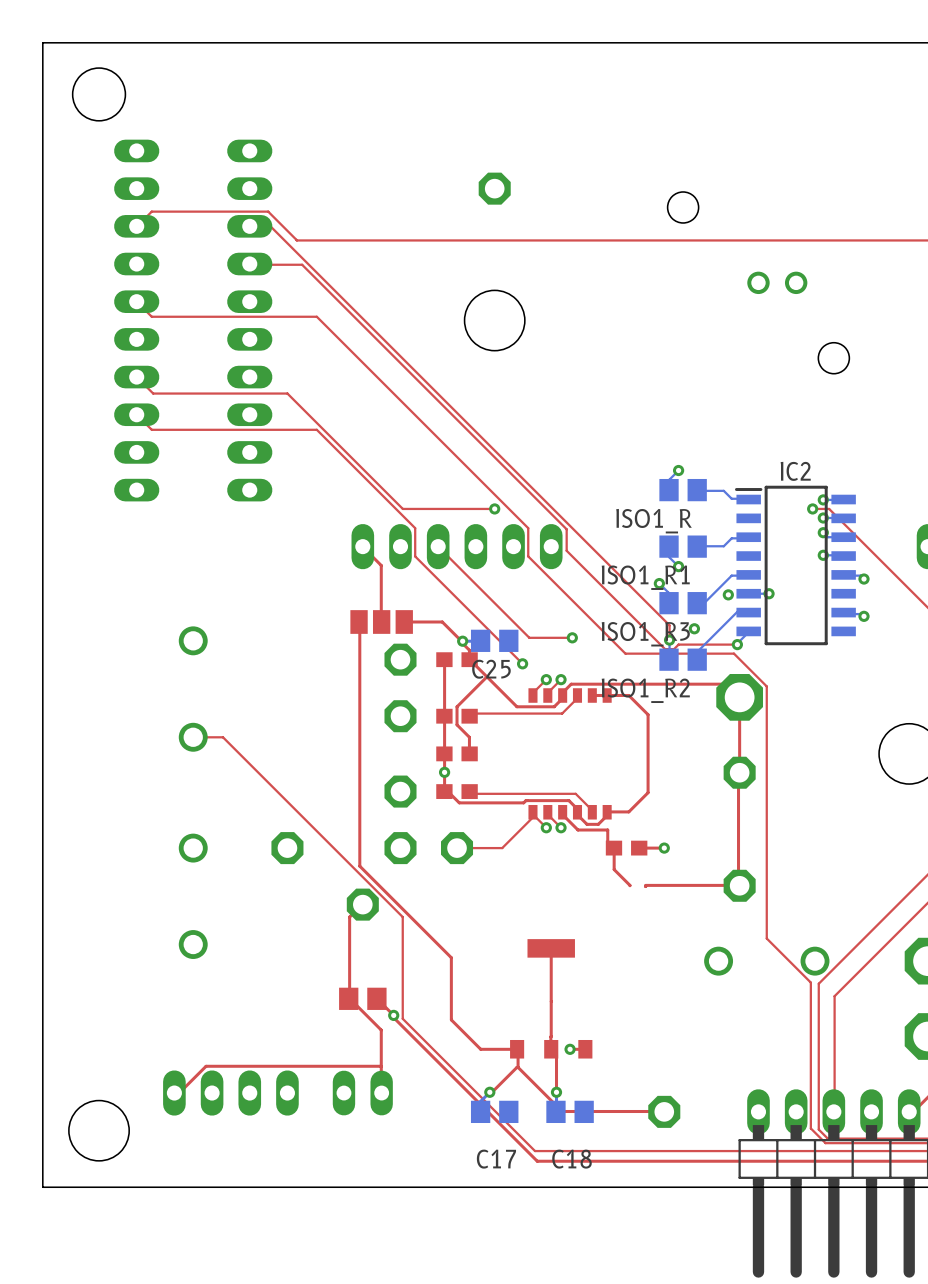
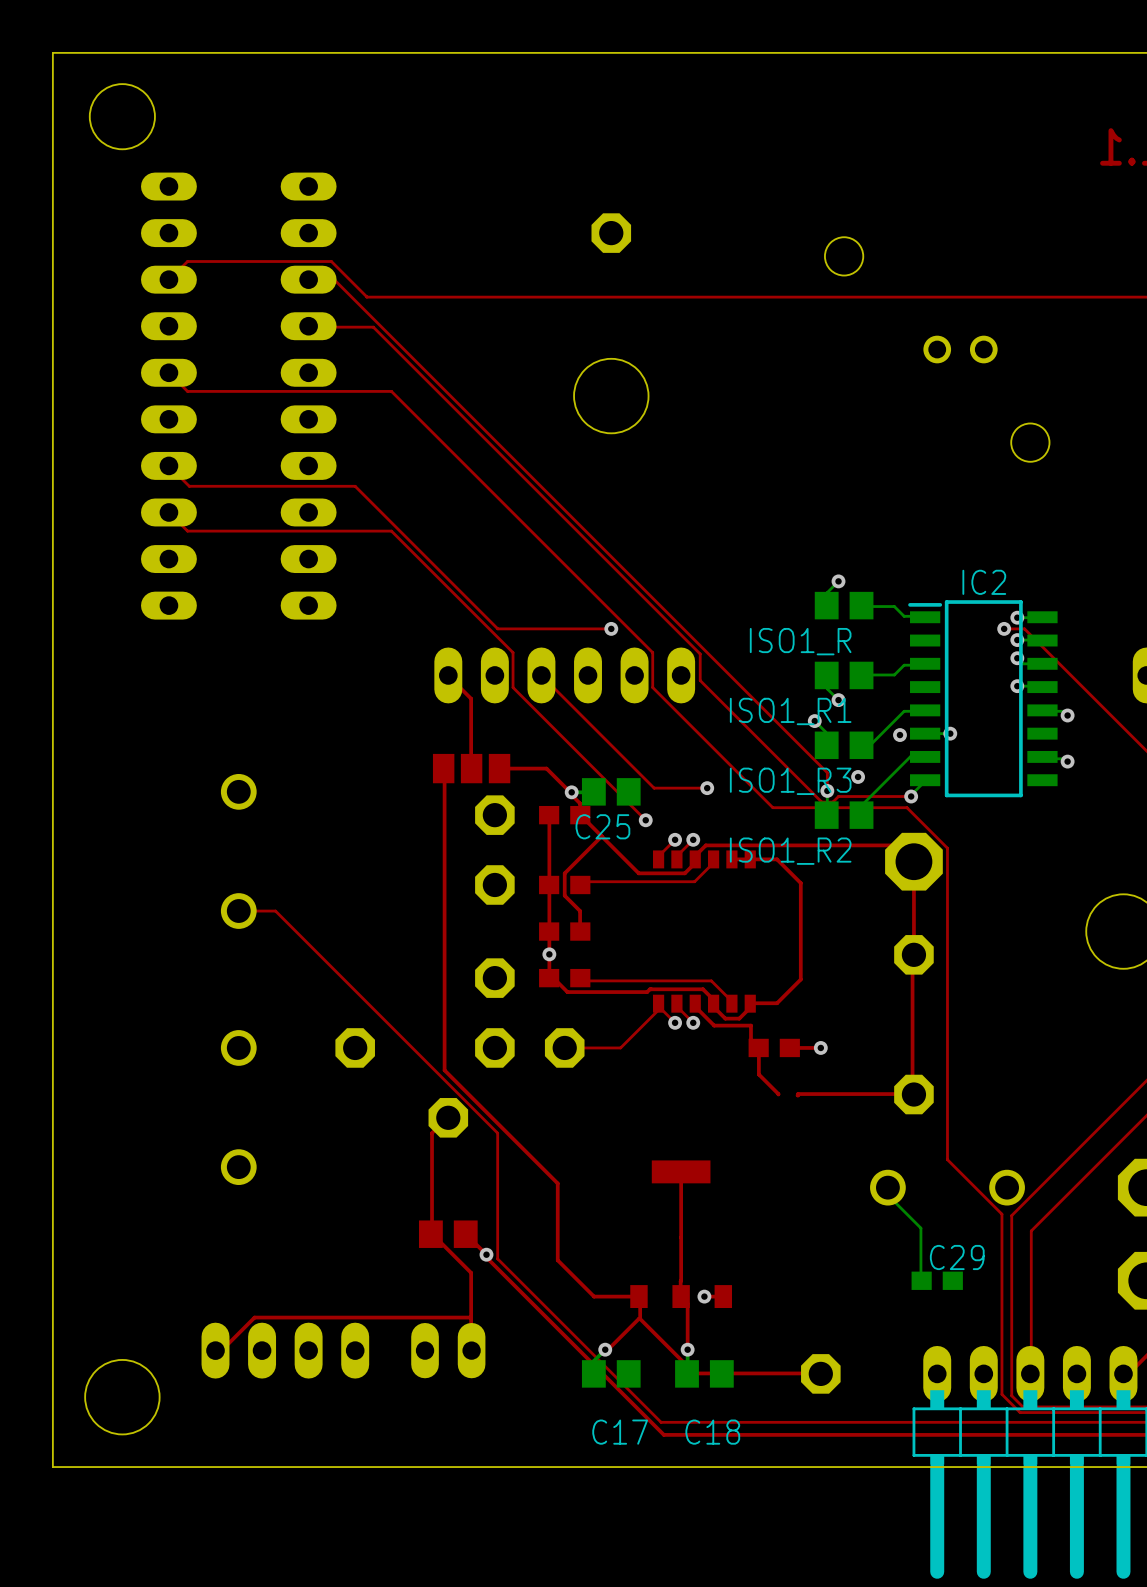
bottom track: none -> (887, 1187) (888, 1196) (920, 1228) (921, 1280)
C29: none -> (937, 1280)

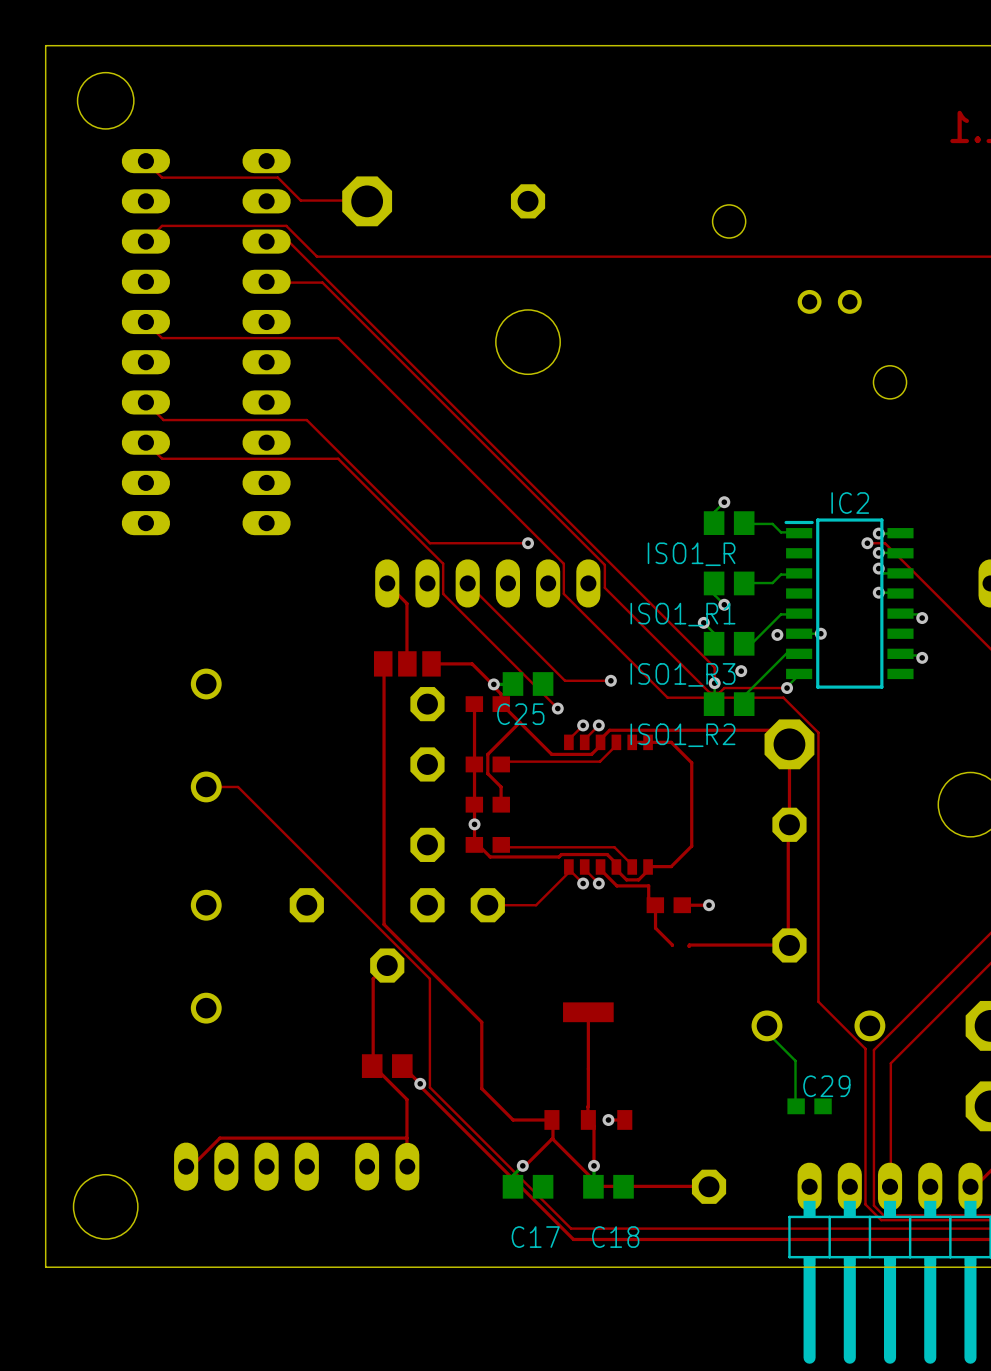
top track: none -> (145, 161) (162, 177) (277, 177) (300, 200) (367, 201)
part: none -> (367, 201)

